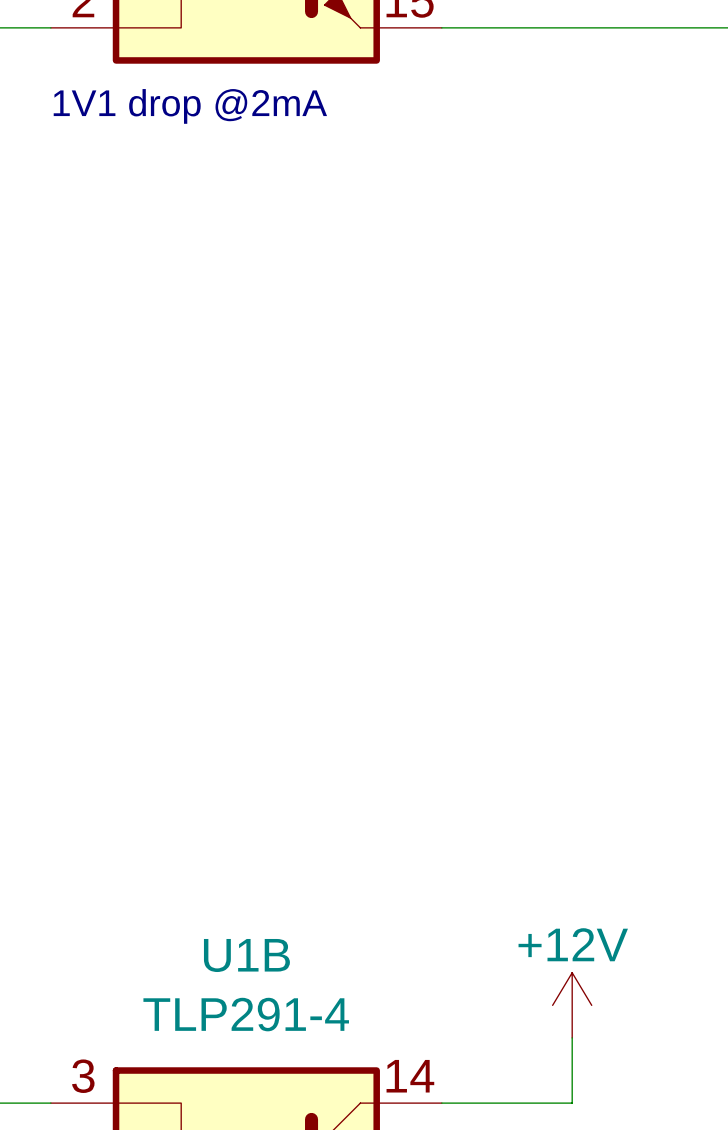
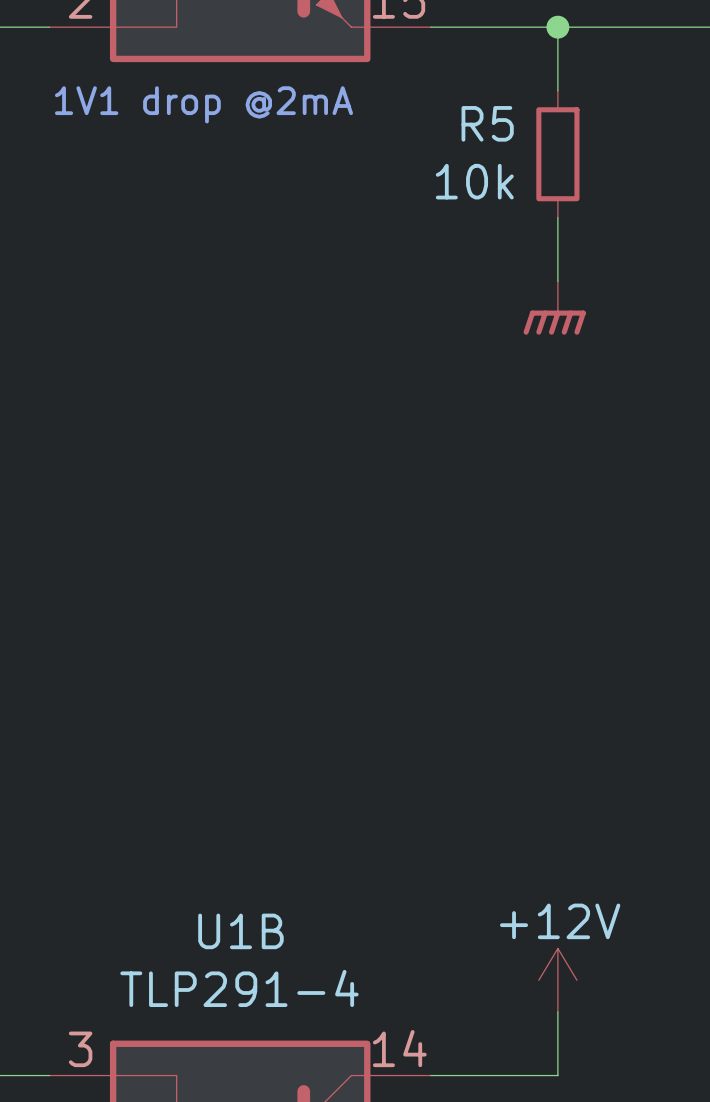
wire: none -> (557, 27) (557, 90)
junction: none -> (557, 27)
R5: none -> 10k (557, 154)
wire: none -> (557, 217) (557, 281)
power symbol: none -> (554, 308)

